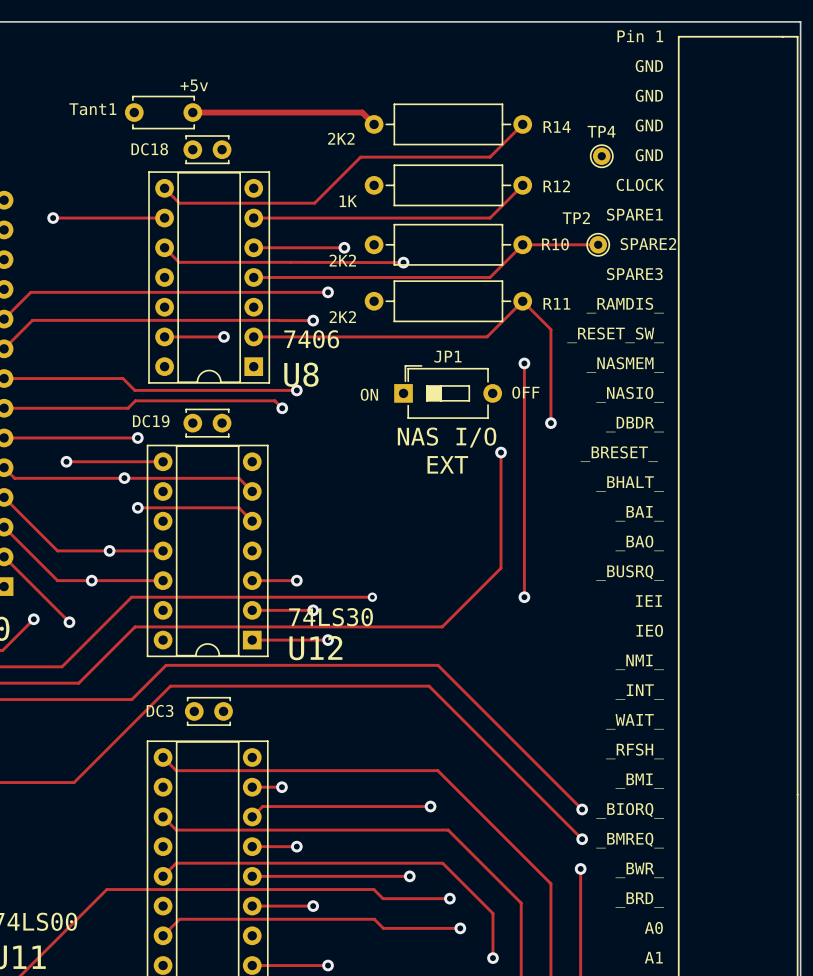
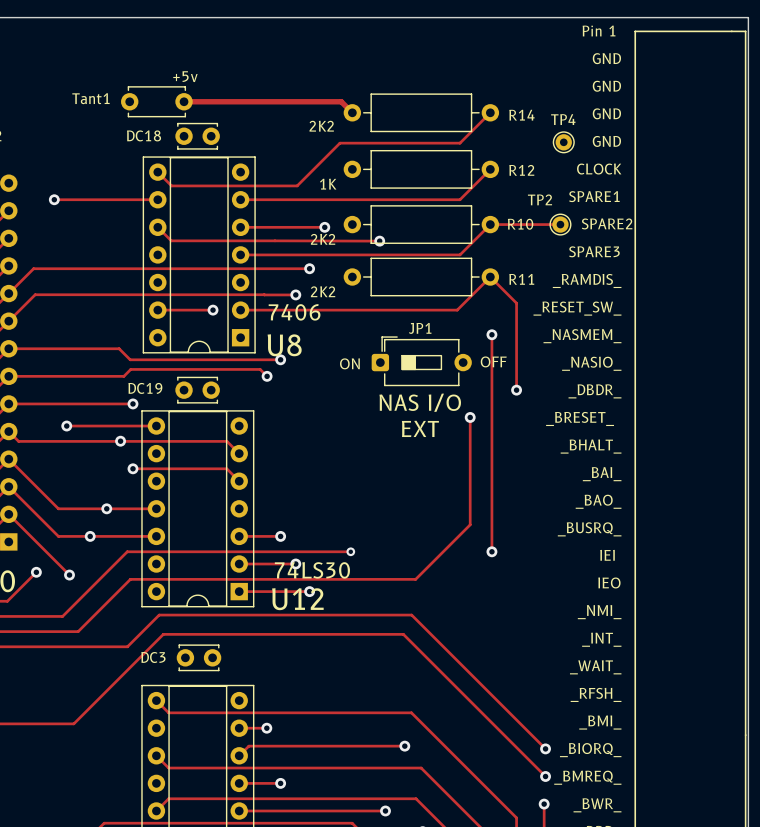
JP1 footprint: [394, 365, 503, 419] -> [371, 336, 472, 387]

